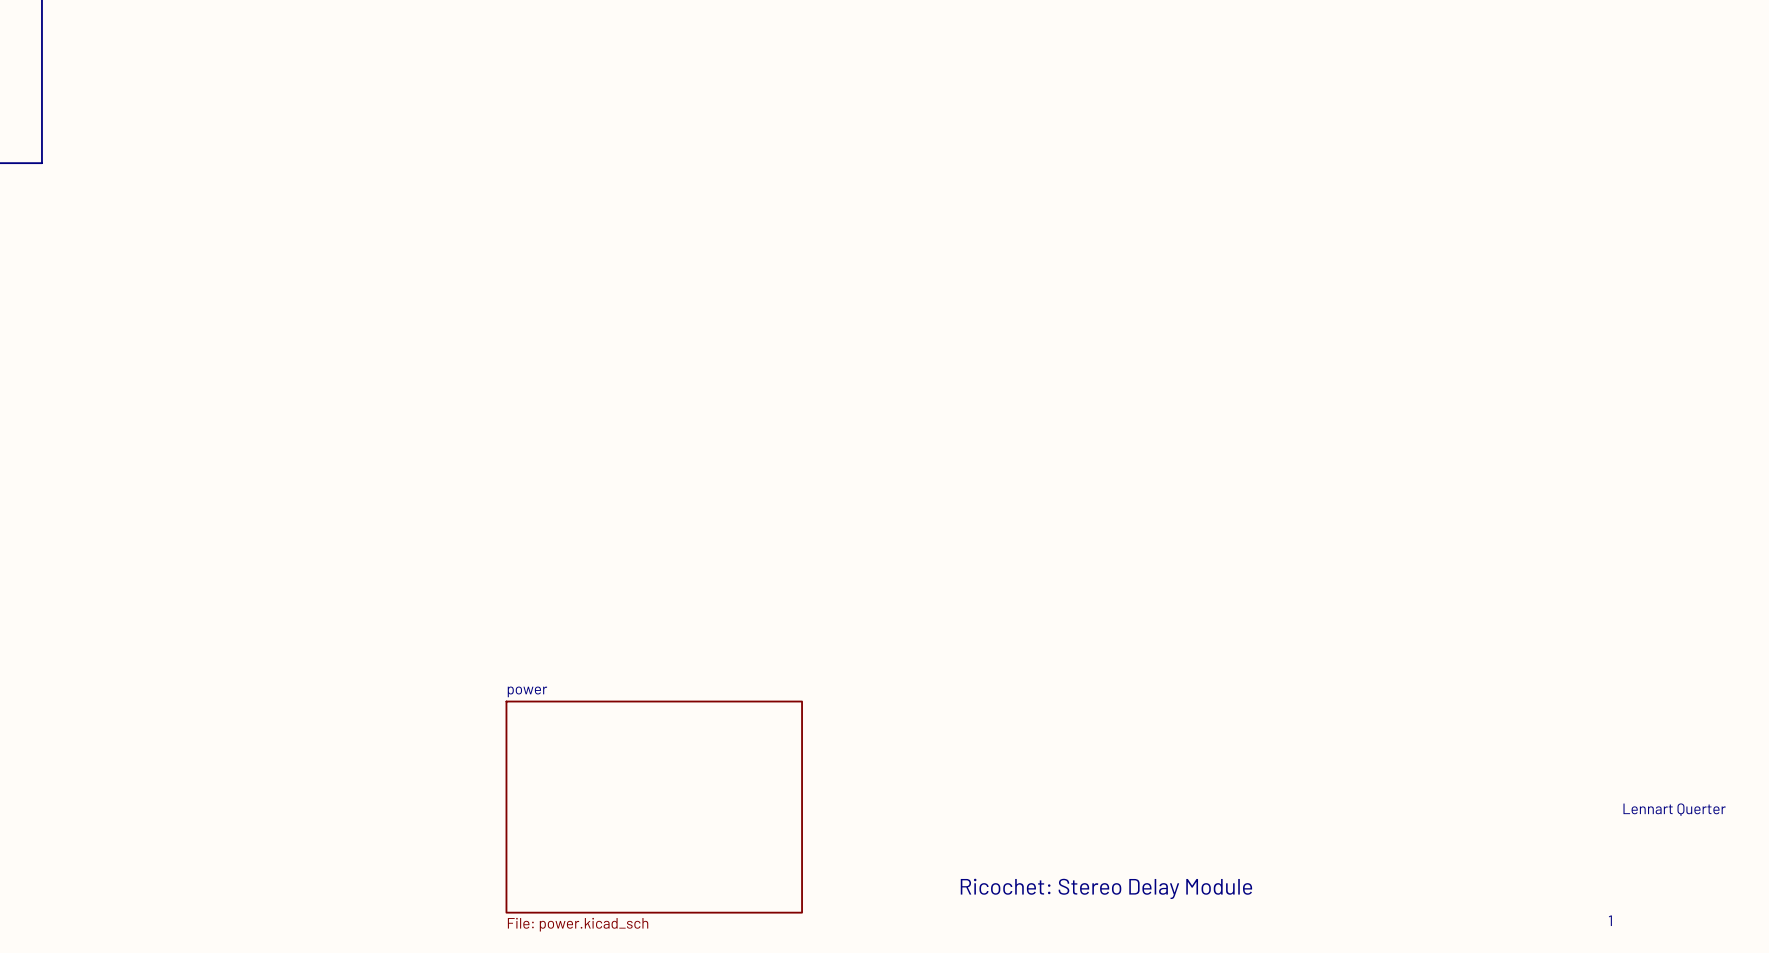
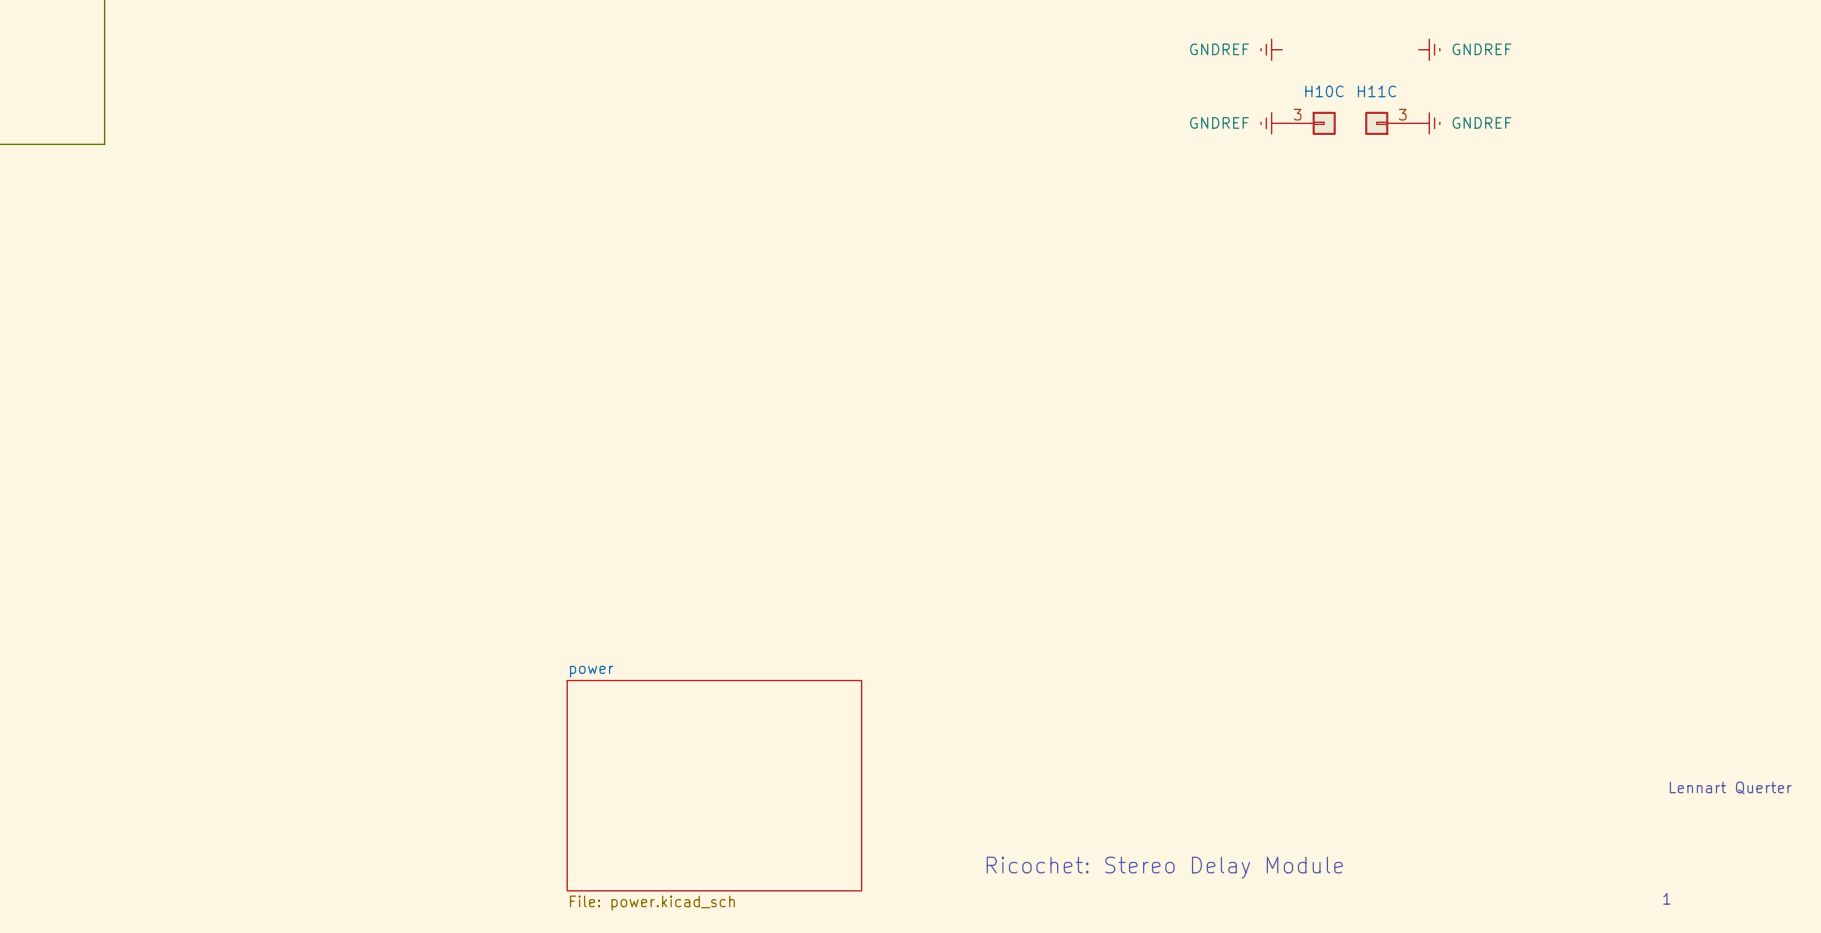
power symbol: none -> GNDREF (1271, 49)
power symbol: none -> GNDREF (1429, 49)
power symbol: none -> GNDREF (1271, 123)
H10C: none -> (1308, 123)
H11C: none -> (1391, 123)
power symbol: none -> GNDREF (1429, 123)

